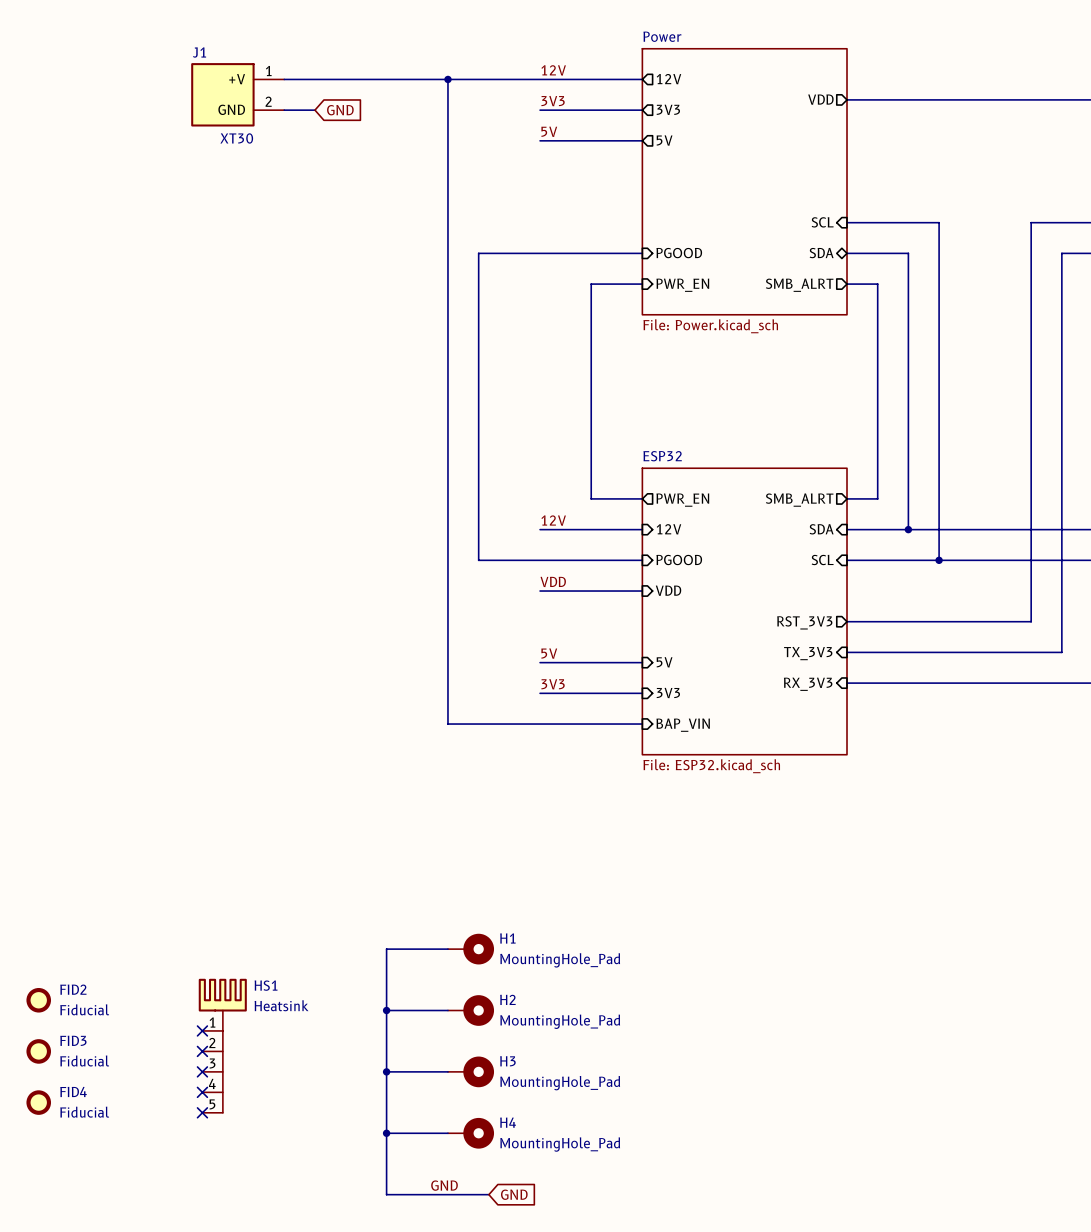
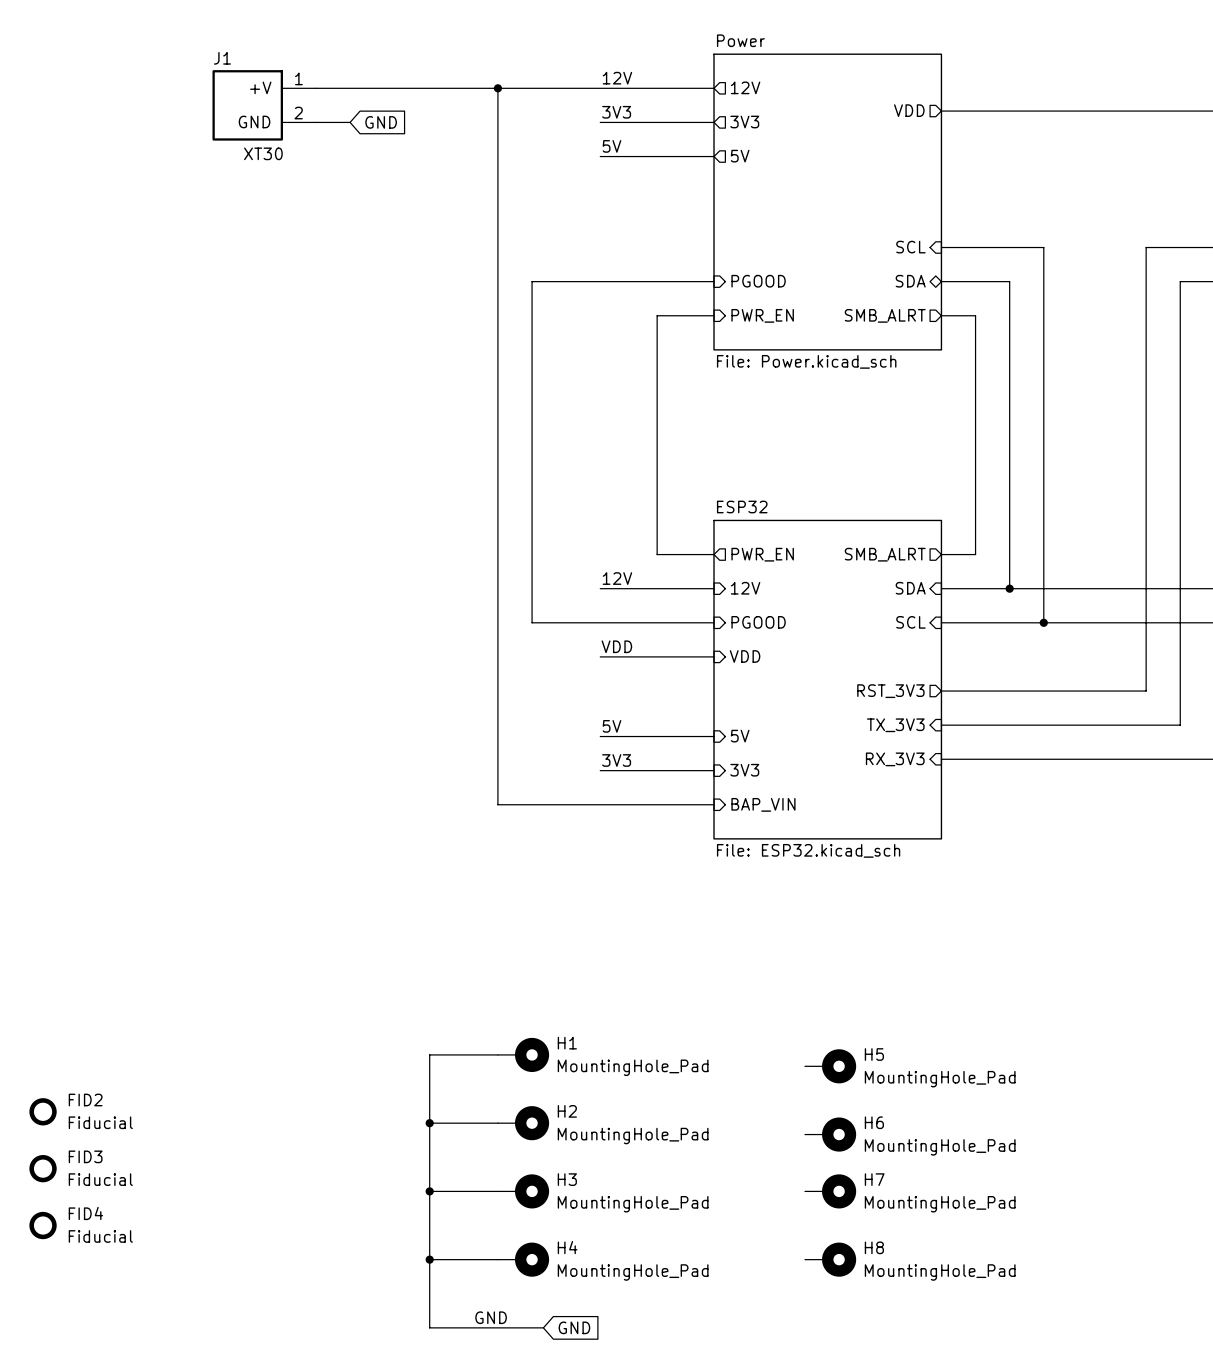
H5: none -> MountingHole_Pad (830, 1066)
H6: none -> MountingHole_Pad (830, 1134)
no-connect mark: (202, 1030) -> none
HS1: Heatsink (222, 1045) -> none
no-connect mark: (202, 1051) -> none
no-connect mark: (202, 1071) -> none
H7: none -> MountingHole_Pad (830, 1191)
no-connect mark: (202, 1092) -> none
no-connect mark: (202, 1112) -> none
H8: none -> MountingHole_Pad (830, 1259)

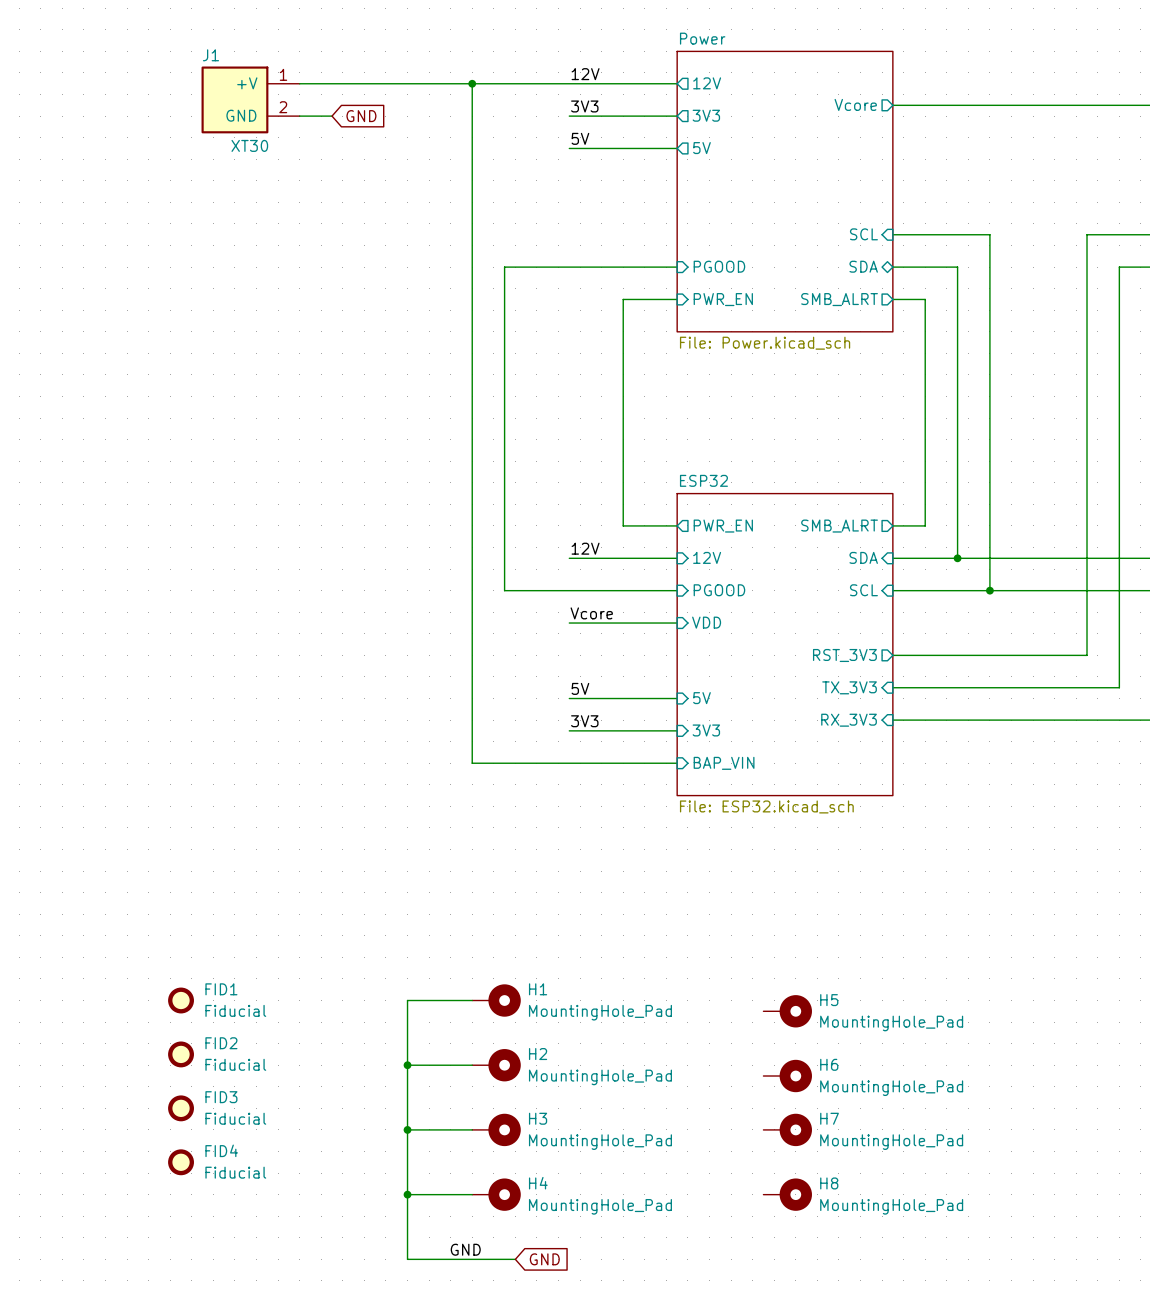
sheet pin: VDD (909, 110) -> Vcore (855, 104)
label: VDD (616, 646) -> Vcore (591, 613)
FID1: none -> Fiducial (181, 1000)
FID2 position: (43, 1111) -> (181, 1054)
FID3 position: (43, 1168) -> (181, 1108)
FID4 position: (43, 1225) -> (181, 1162)

